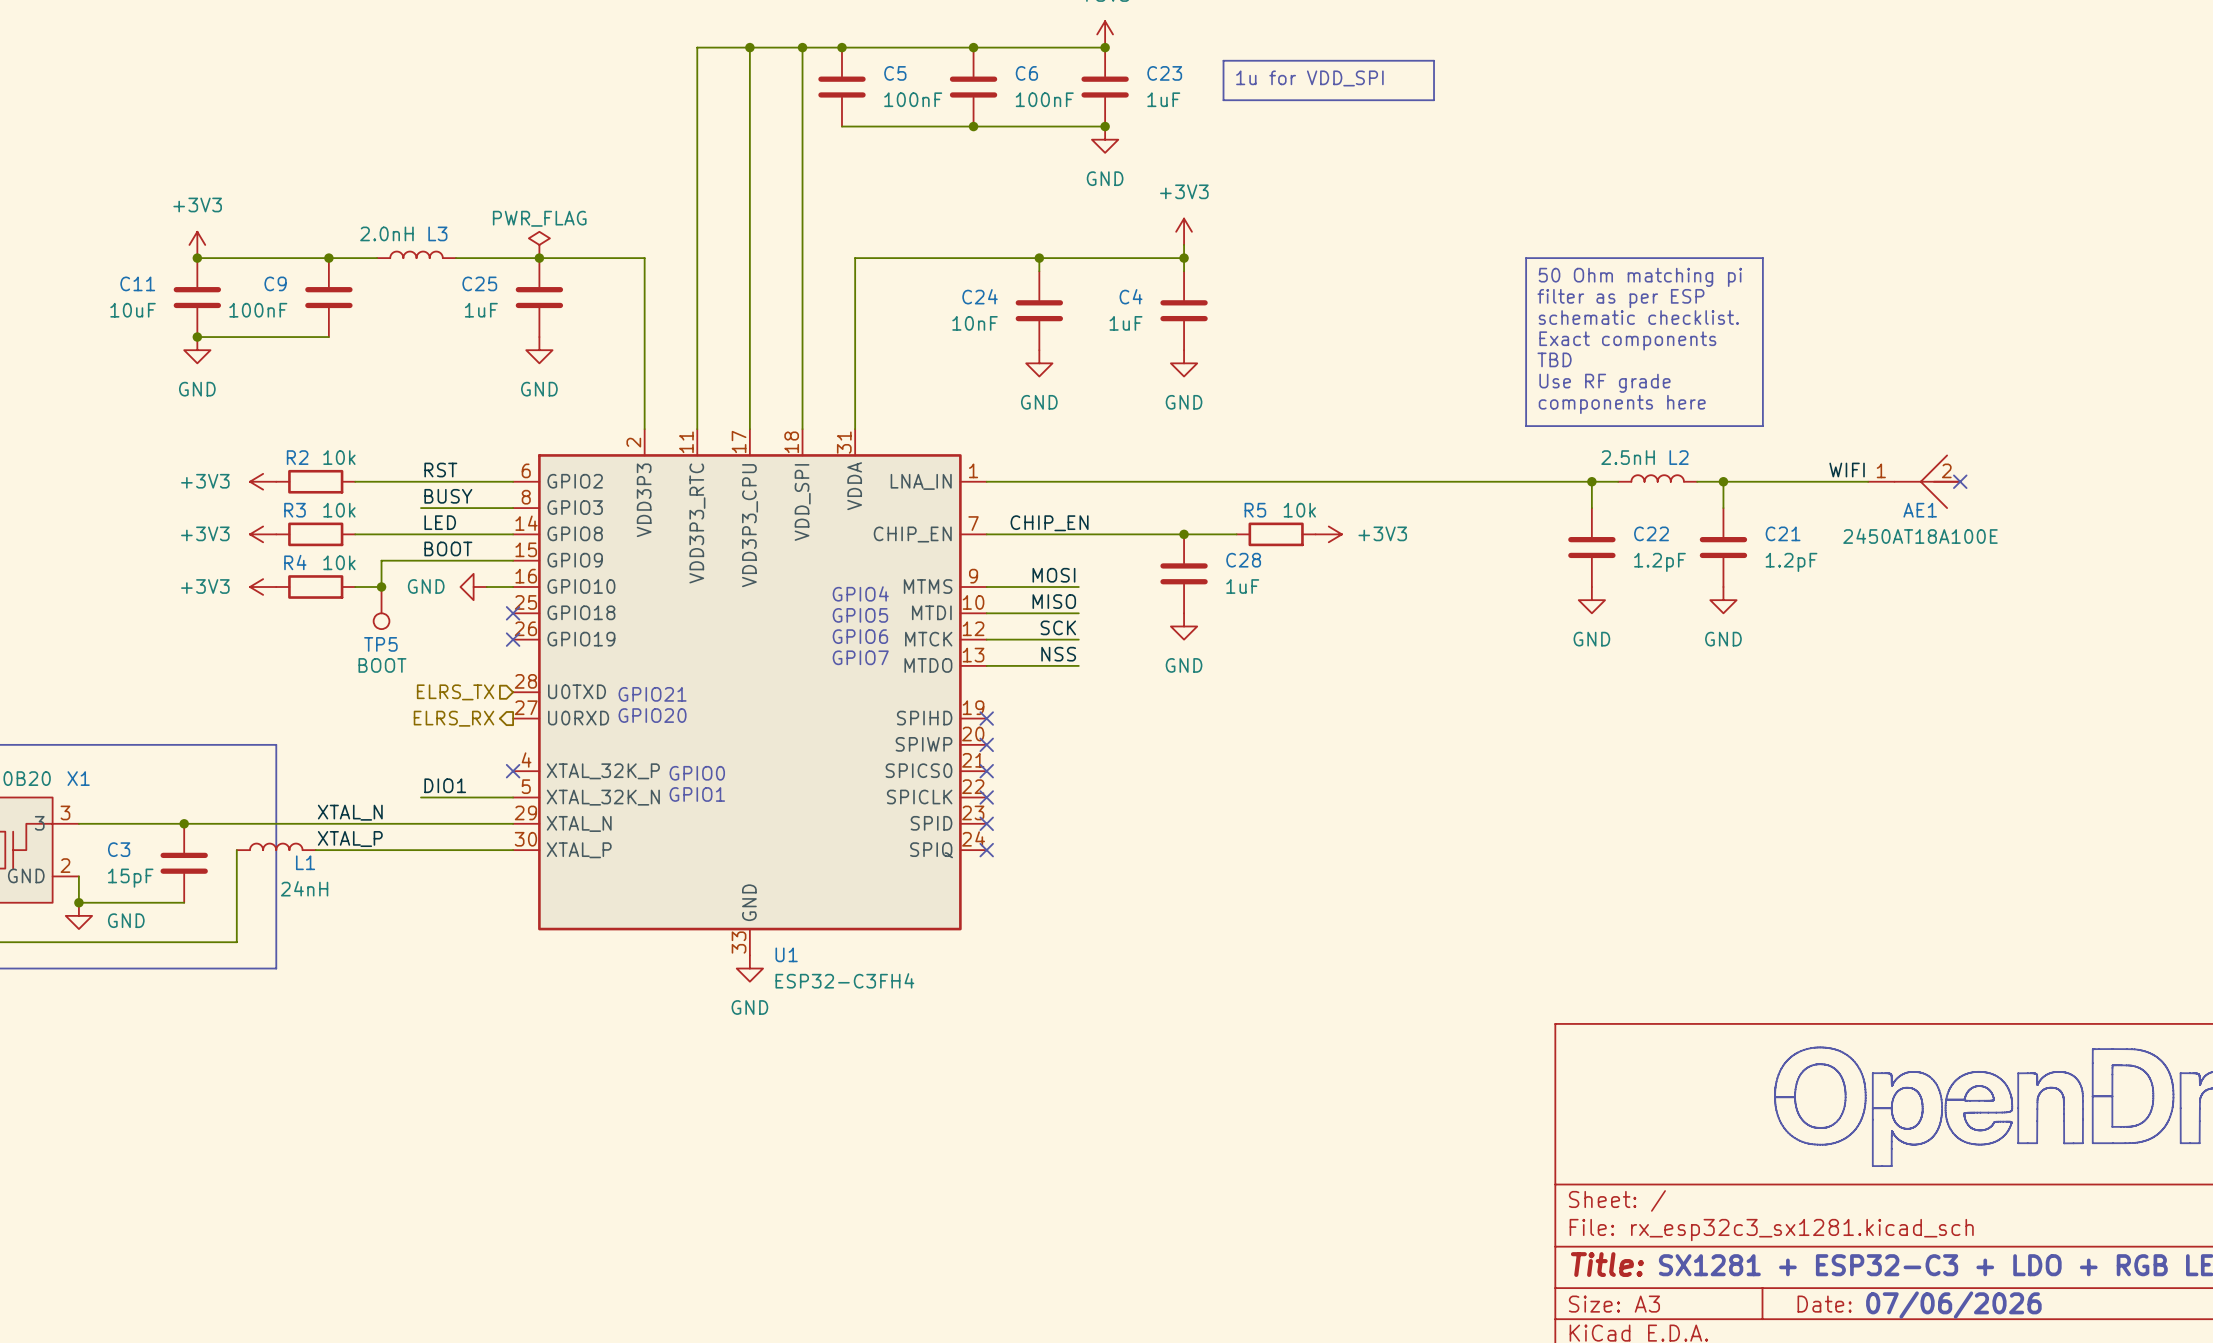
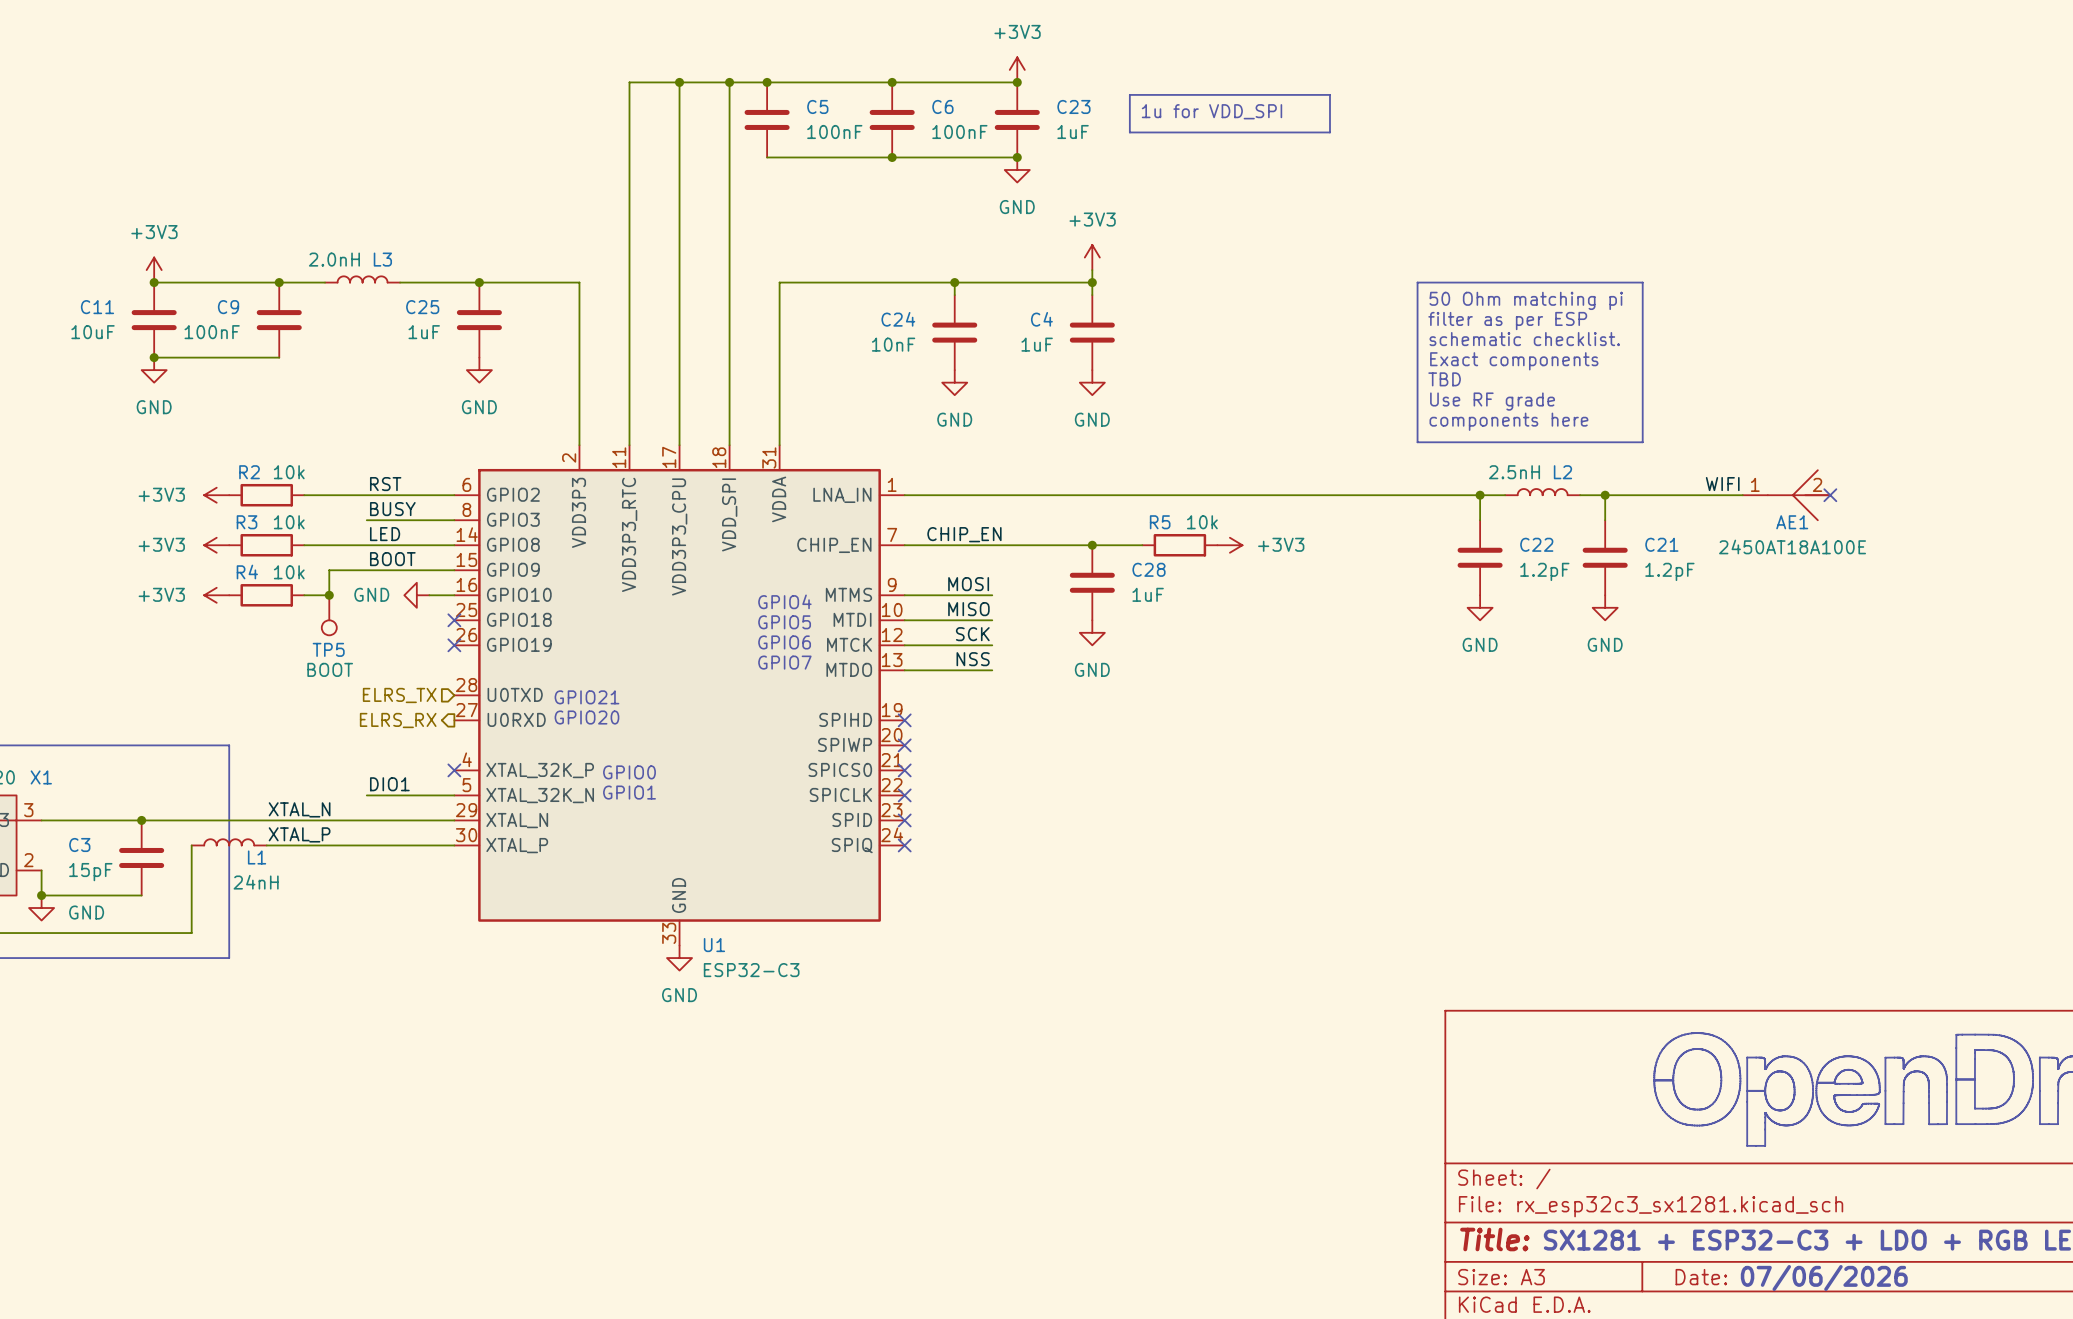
power symbol: PWR_FLAG (539, 244) -> none
U1 value: ESP32-C3FH4 (844, 980) -> ESP32-C3 (751, 970)

